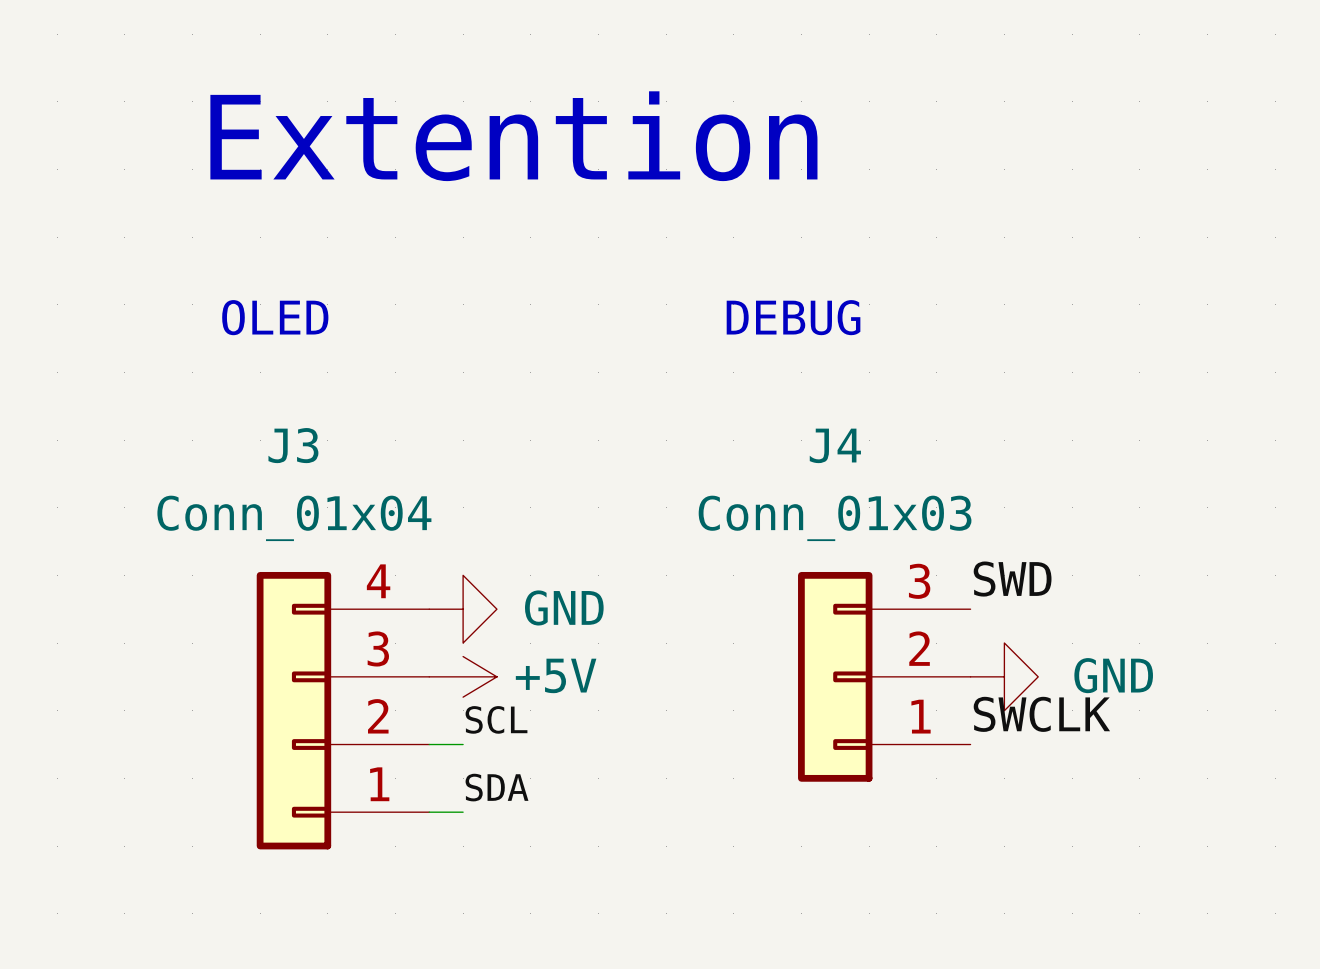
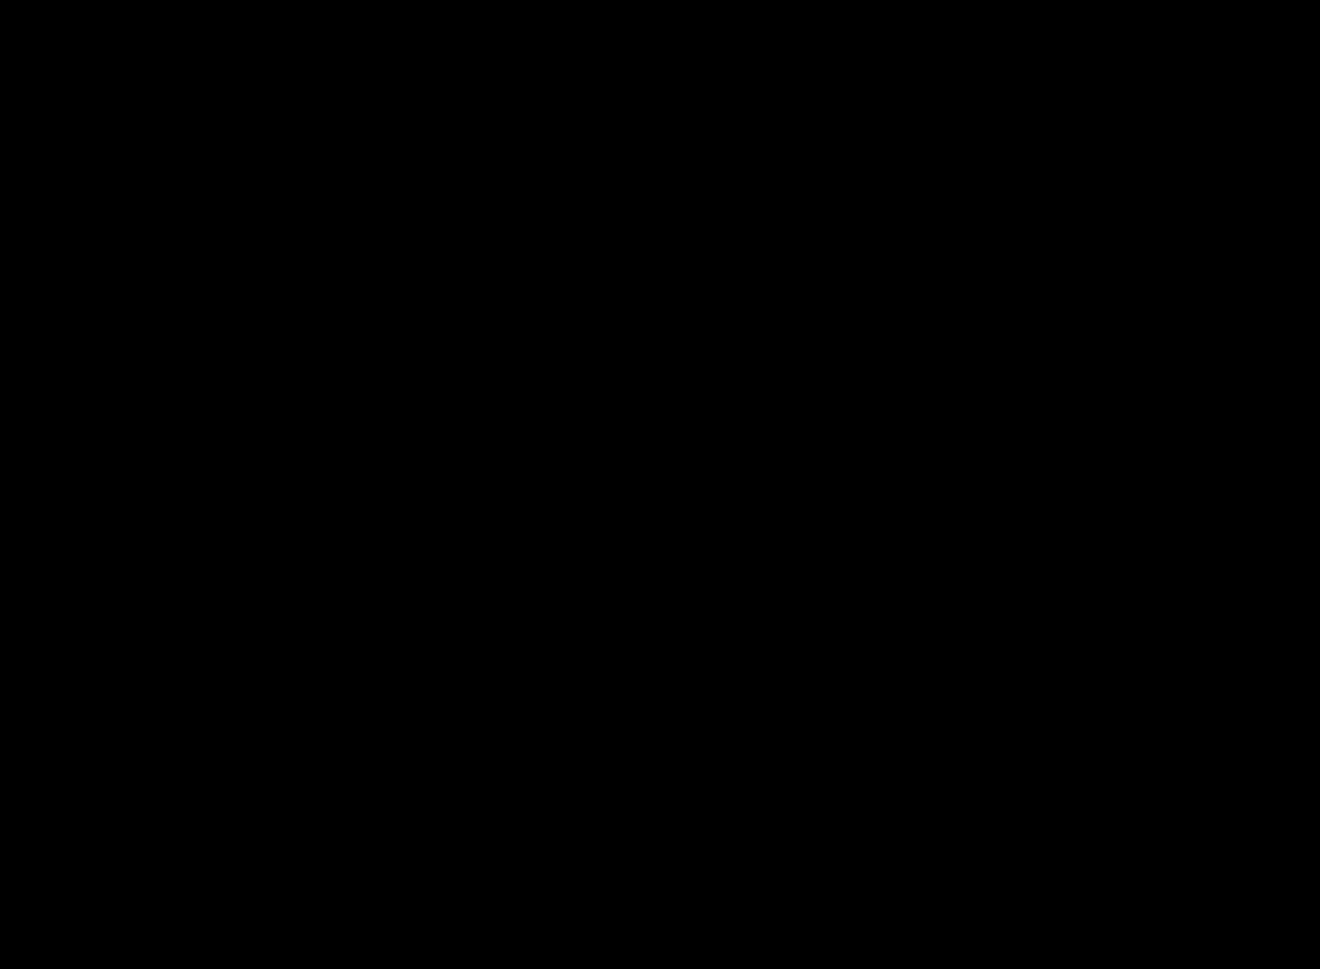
text: Extention (513, 136) -> none
text: OLED (275, 317) -> none
text: DEBUG (793, 317) -> none
label: SWD (1012, 579) -> none
power symbol: GND (463, 609) -> none
power symbol: +5V (463, 676) -> none
J4: Conn_01x03 (884, 676) -> none
power symbol: GND (1004, 676) -> none
J3: Conn_01x04 (343, 710) -> none
label: SWCLK (1041, 714) -> none
label: SCL (496, 719) -> none
wire: (429, 744) (463, 744) -> none
label: SDA (497, 787) -> none
wire: (429, 812) (463, 812) -> none

